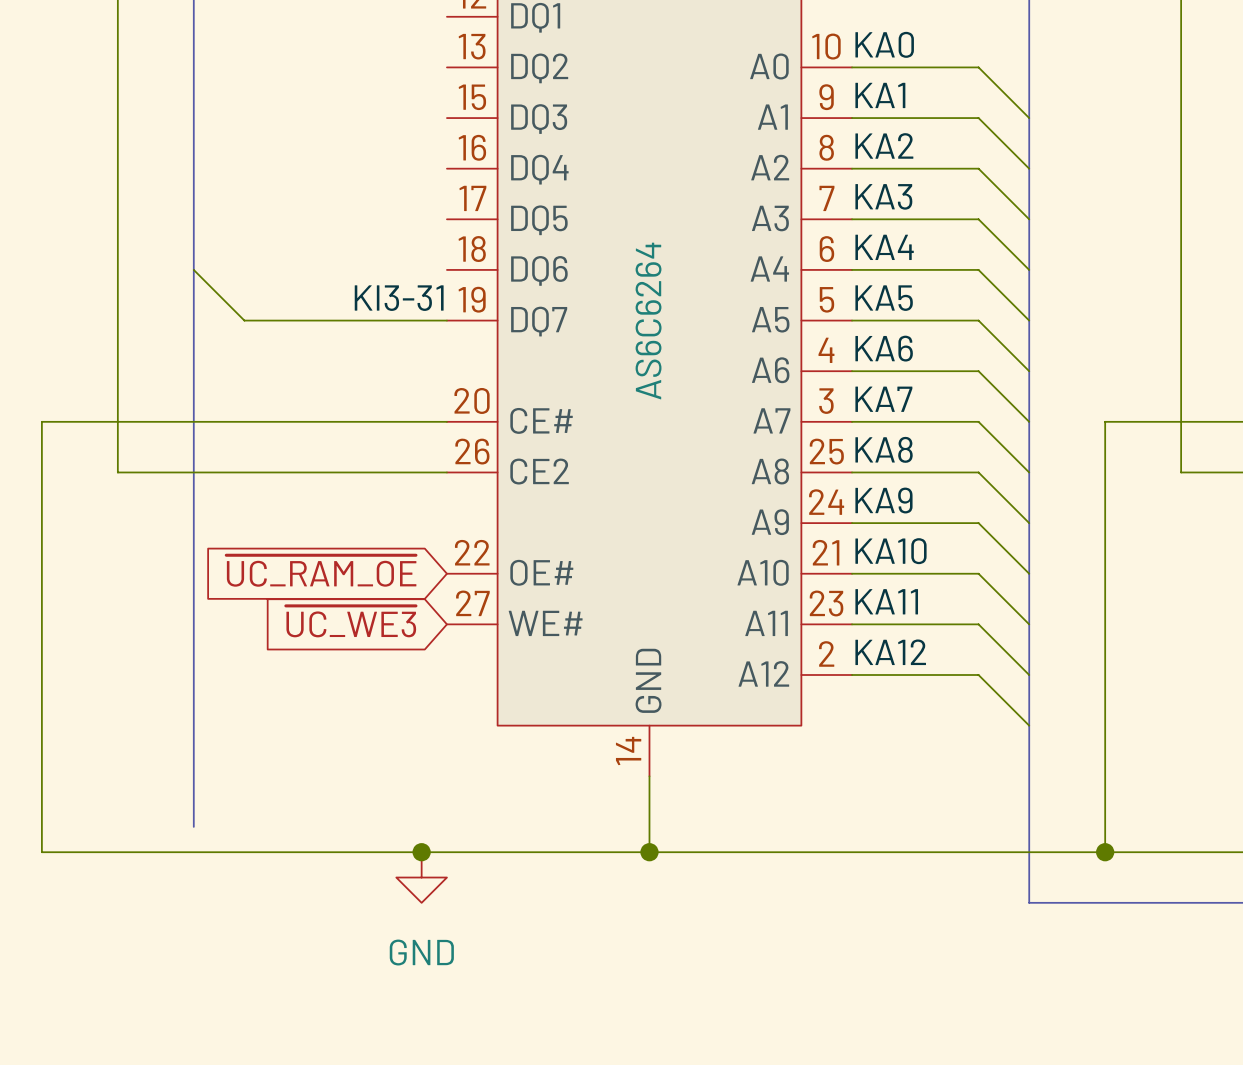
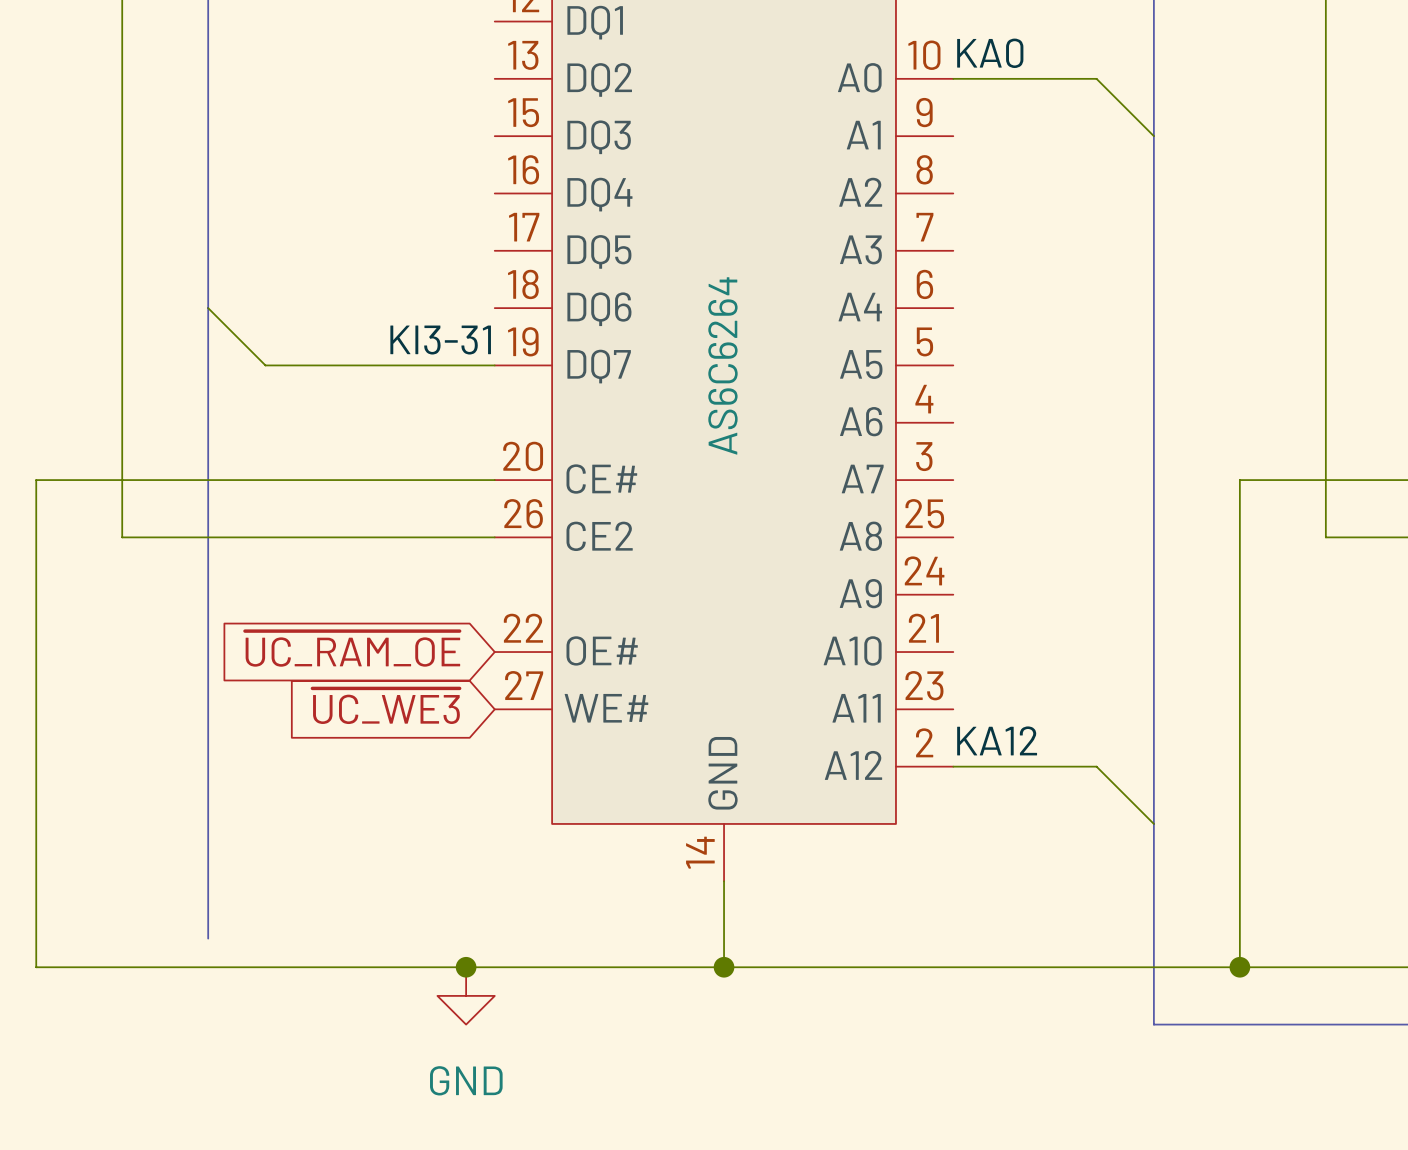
label: KA1 (880, 95) -> none
wire: (852, 118) (978, 118) (1029, 168) -> none
label: KA2 (884, 145) -> none
wire: (852, 168) (978, 168) (1029, 219) -> none
label: KA3 (883, 196) -> none
wire: (852, 219) (978, 219) (1029, 269) -> none
label: KA4 (884, 247) -> none
wire: (852, 269) (978, 269) (1029, 320) -> none
label: KA5 (884, 298) -> none
wire: (852, 320) (978, 320) (1029, 371) -> none
label: KA6 (884, 348) -> none
wire: (852, 371) (978, 371) (1029, 421) -> none
label: KA7 (883, 399) -> none
wire: (852, 421) (978, 421) (1029, 472) -> none
label: KA8 (884, 449) -> none
wire: (852, 472) (978, 472) (1029, 523) -> none
label: KA9 (883, 500) -> none
wire: (852, 523) (978, 523) (1029, 573) -> none
label: KA10 (891, 551) -> none
wire: (852, 573) (978, 573) (1029, 624) -> none
label: KA11 (886, 601) -> none
wire: (852, 624) (978, 624) (1029, 674) -> none

